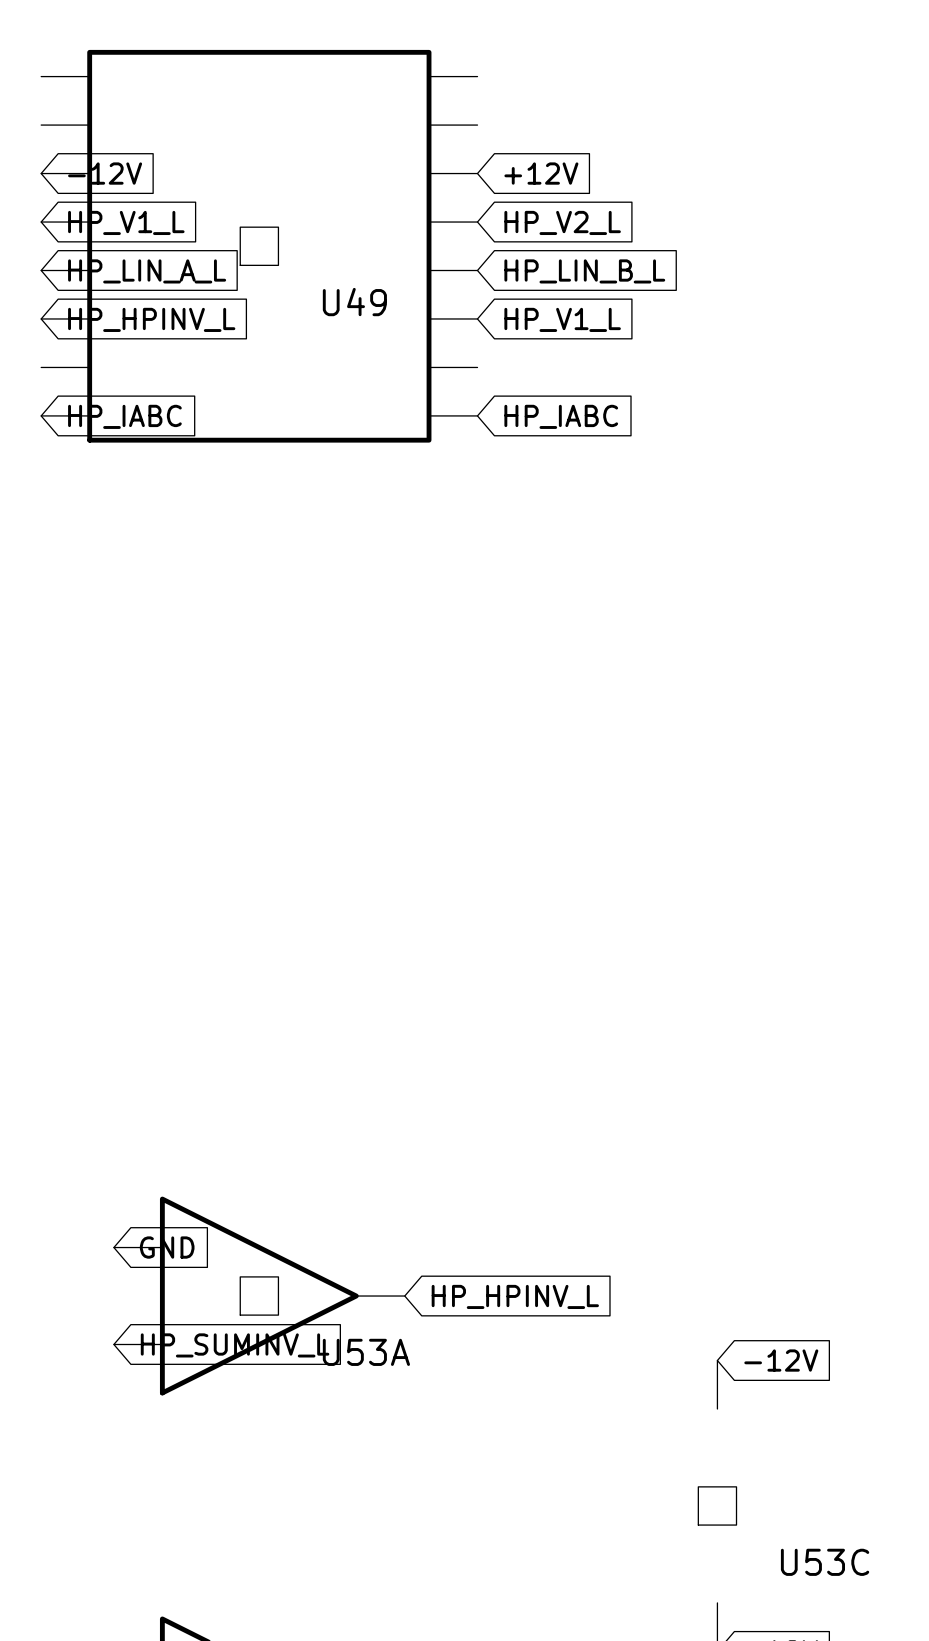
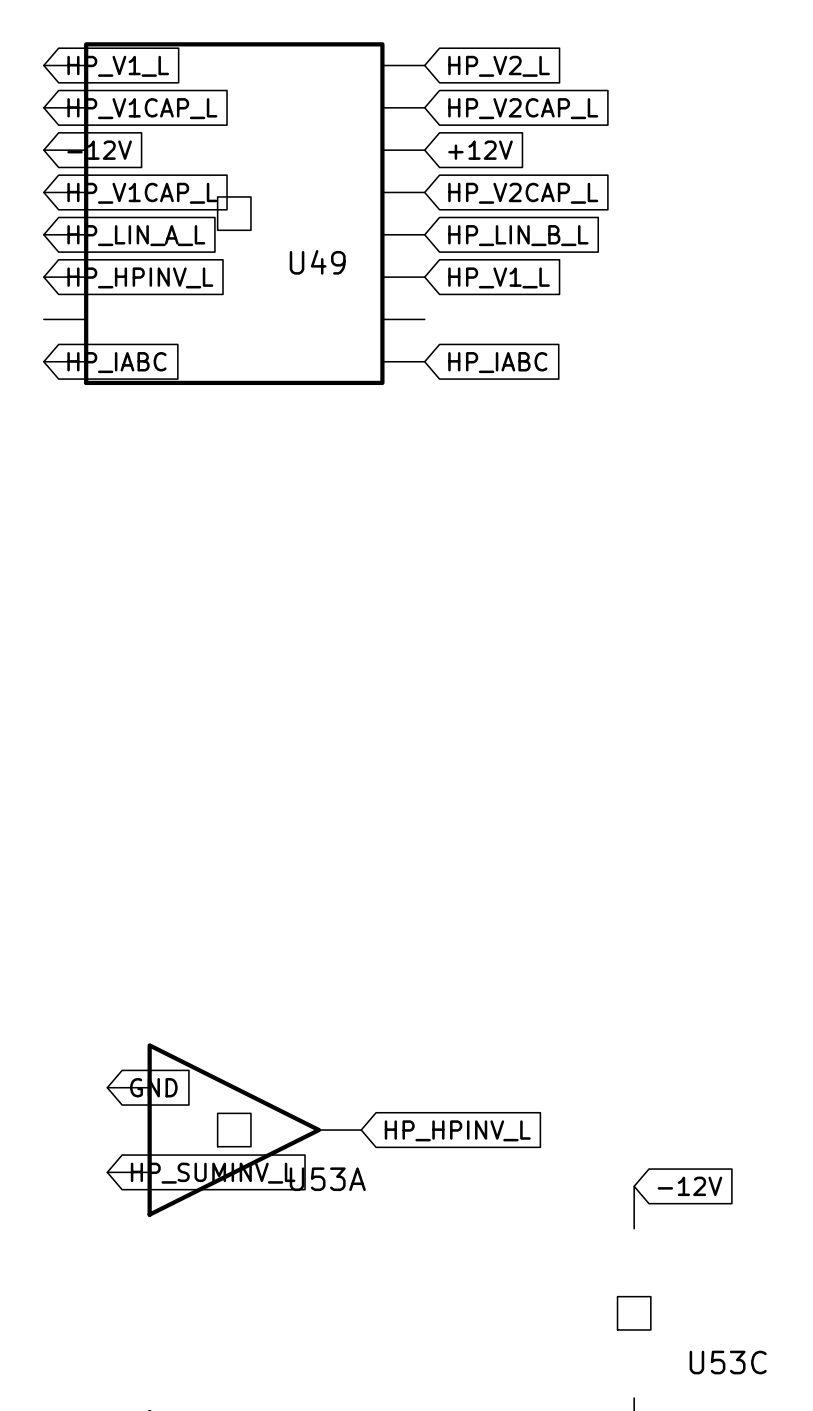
global label: none -> HP_V1_L (118, 66)
global label: none -> HP_V2_L (499, 66)
global label: none -> HP_V1CAP_L (142, 108)
global label: none -> HP_V2CAP_L (523, 108)
global label: HP_V1_L (126, 222) -> HP_V1CAP_L (142, 193)
global label: HP_V2_L (562, 222) -> HP_V2CAP_L (523, 193)

